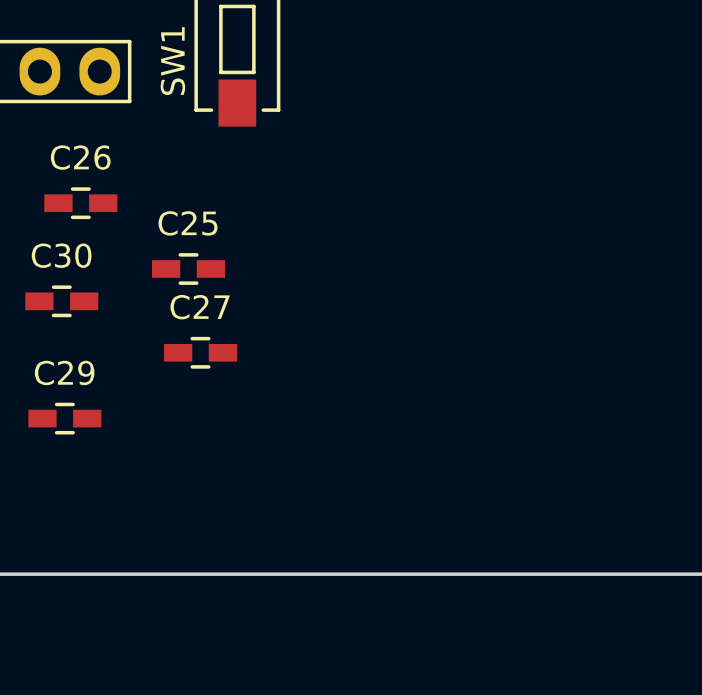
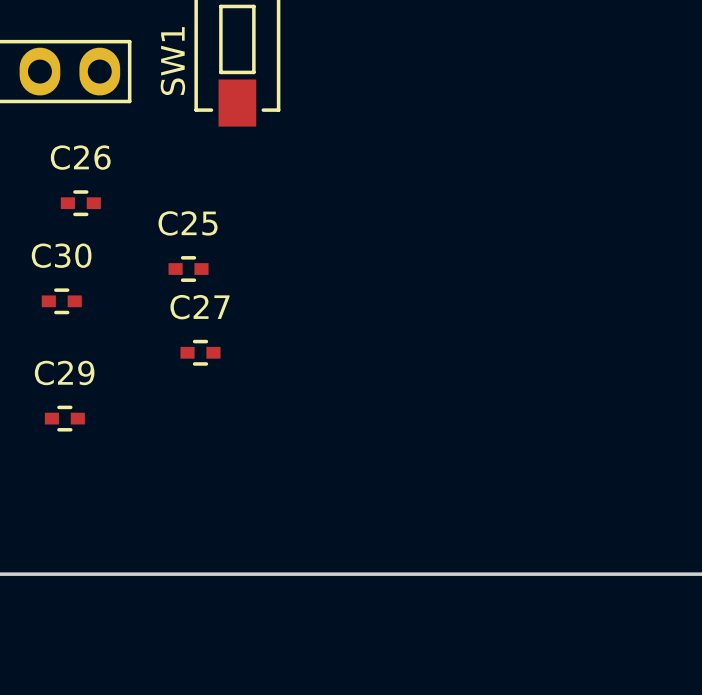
C26 footprint: [44, 187, 118, 220] -> [60, 190, 101, 217]
C25 footprint: [152, 253, 226, 285] -> [168, 256, 209, 282]
C30 footprint: [25, 285, 99, 318] -> [41, 288, 82, 315]
C27 footprint: [163, 336, 238, 369] -> [180, 339, 221, 366]
C29 footprint: [28, 402, 102, 435] -> [44, 405, 85, 432]

